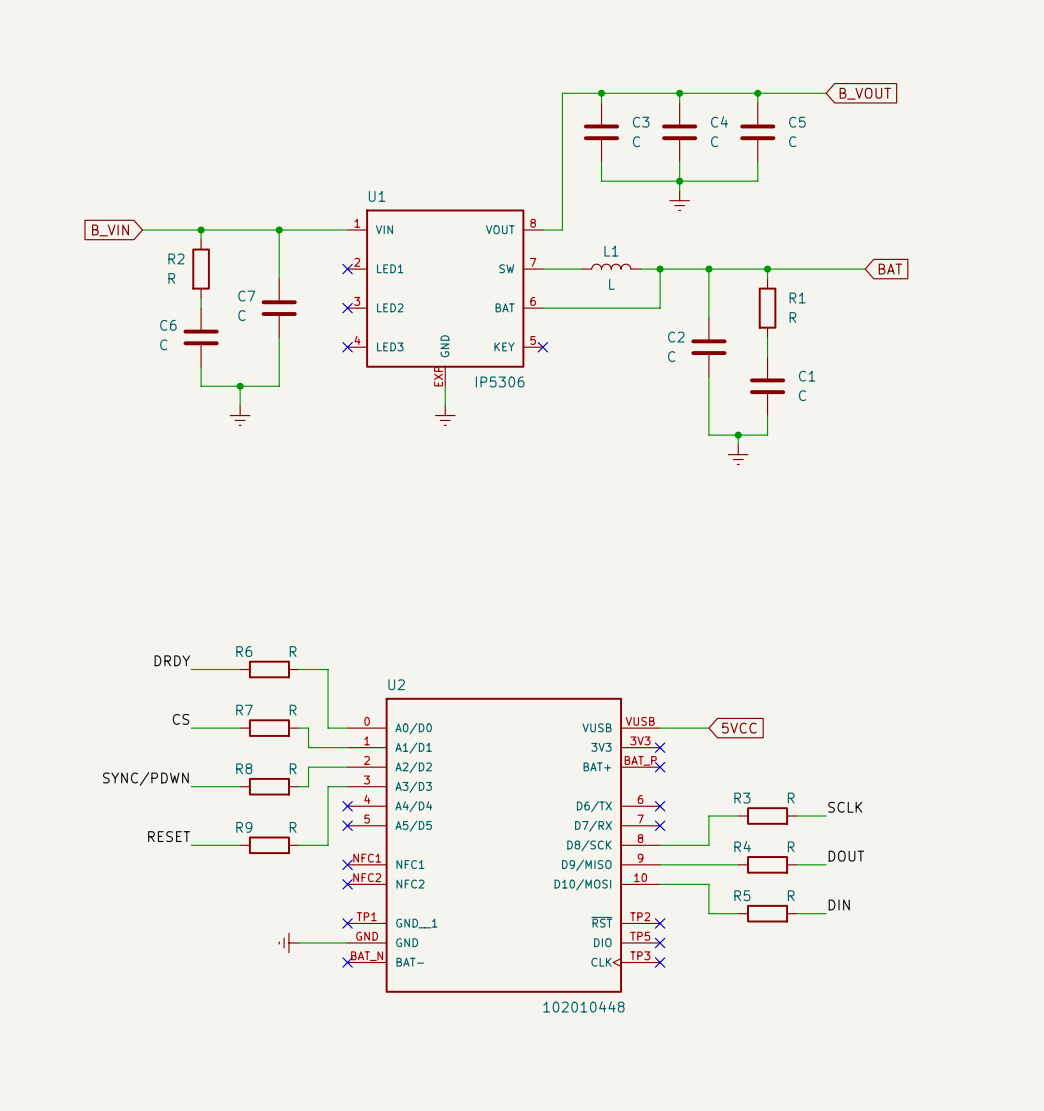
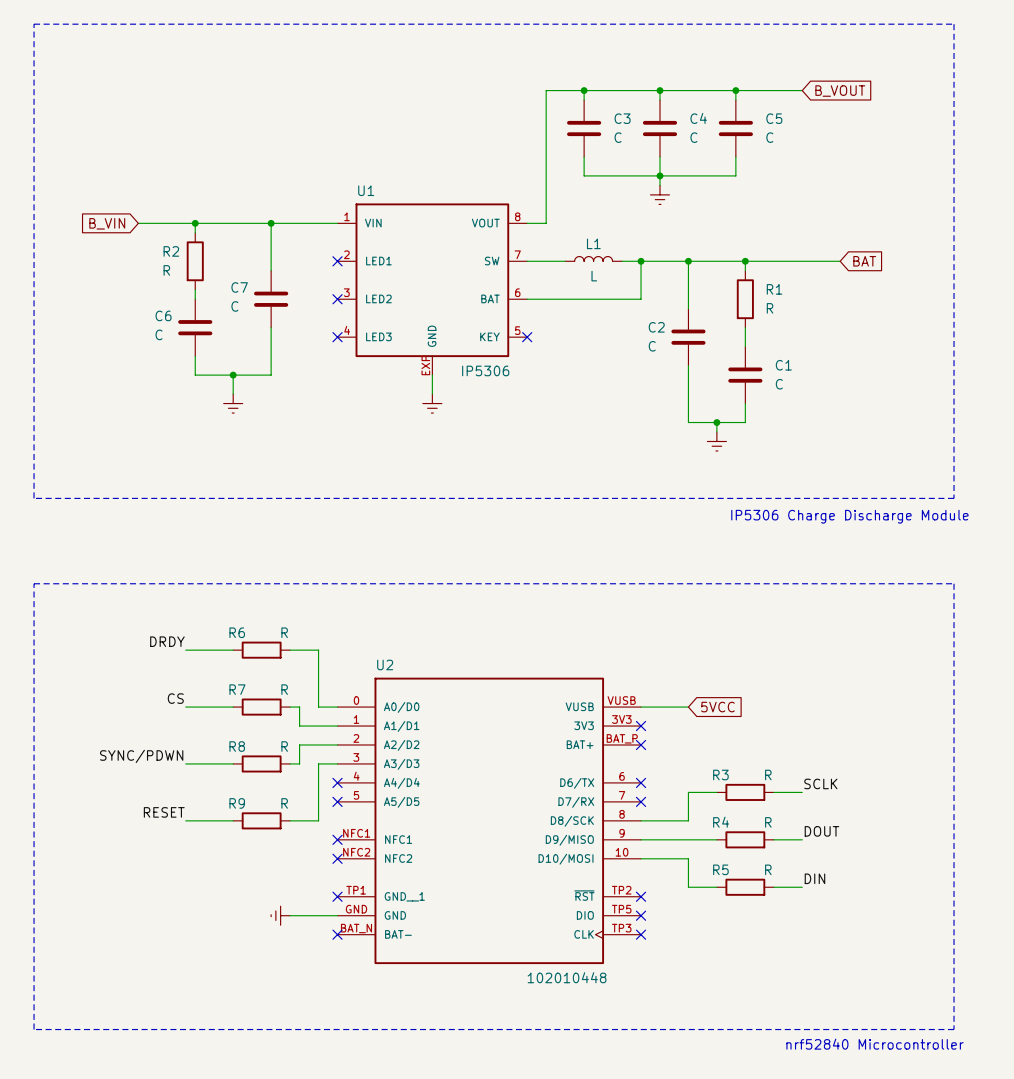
line: none -> (34, 24) (34, 498) (954, 498) (954, 24) (34, 24)
text: none -> IP5306 Charge Discharge Module (849, 516)
line: none -> (34, 583) (954, 583) (954, 1029) (34, 1029) (34, 583)
text: none -> nrf52840 Microcontroller (875, 1044)

